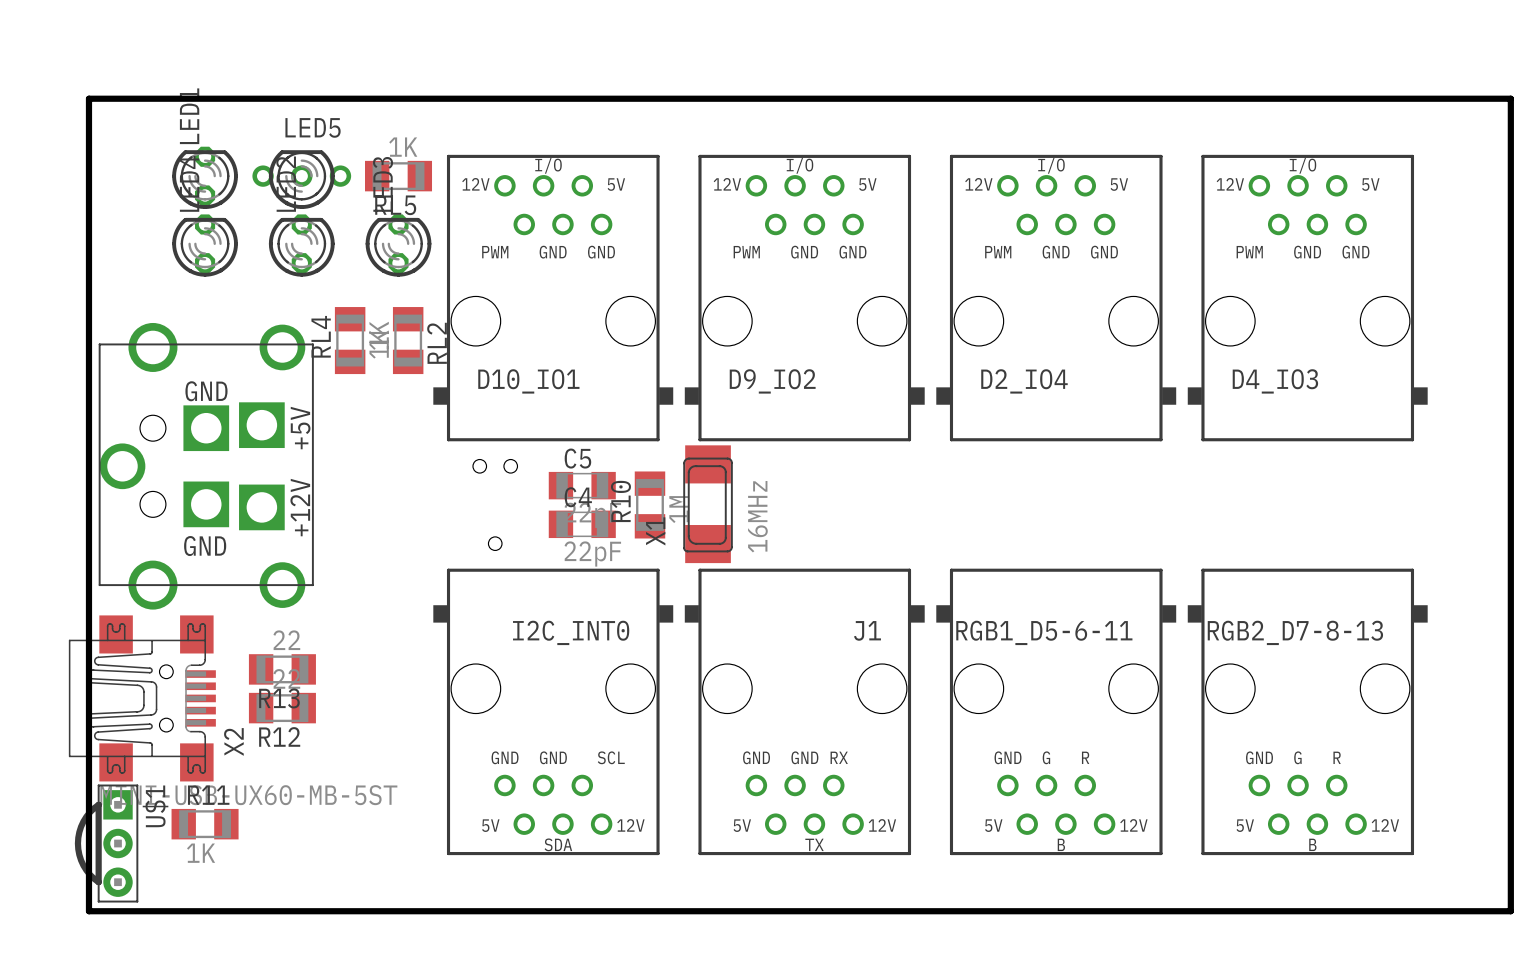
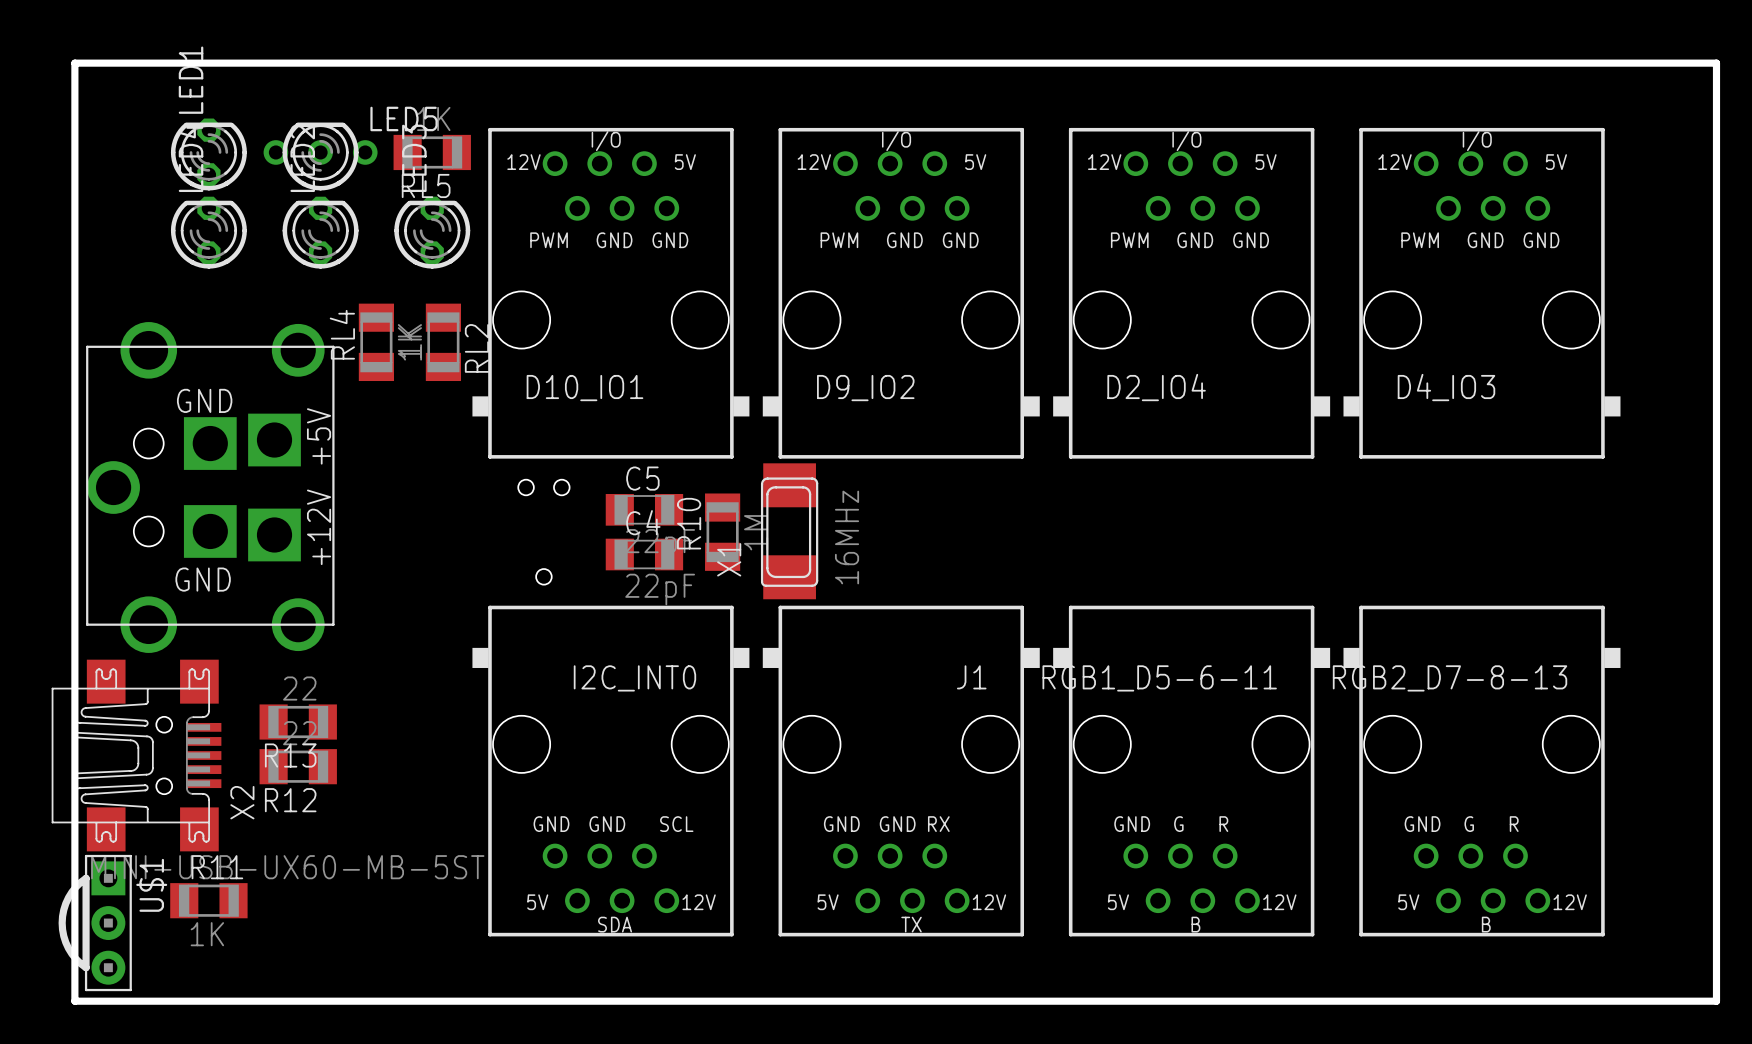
LED5 name position: LED5 (313, 127) -> LED5 (404, 118)

